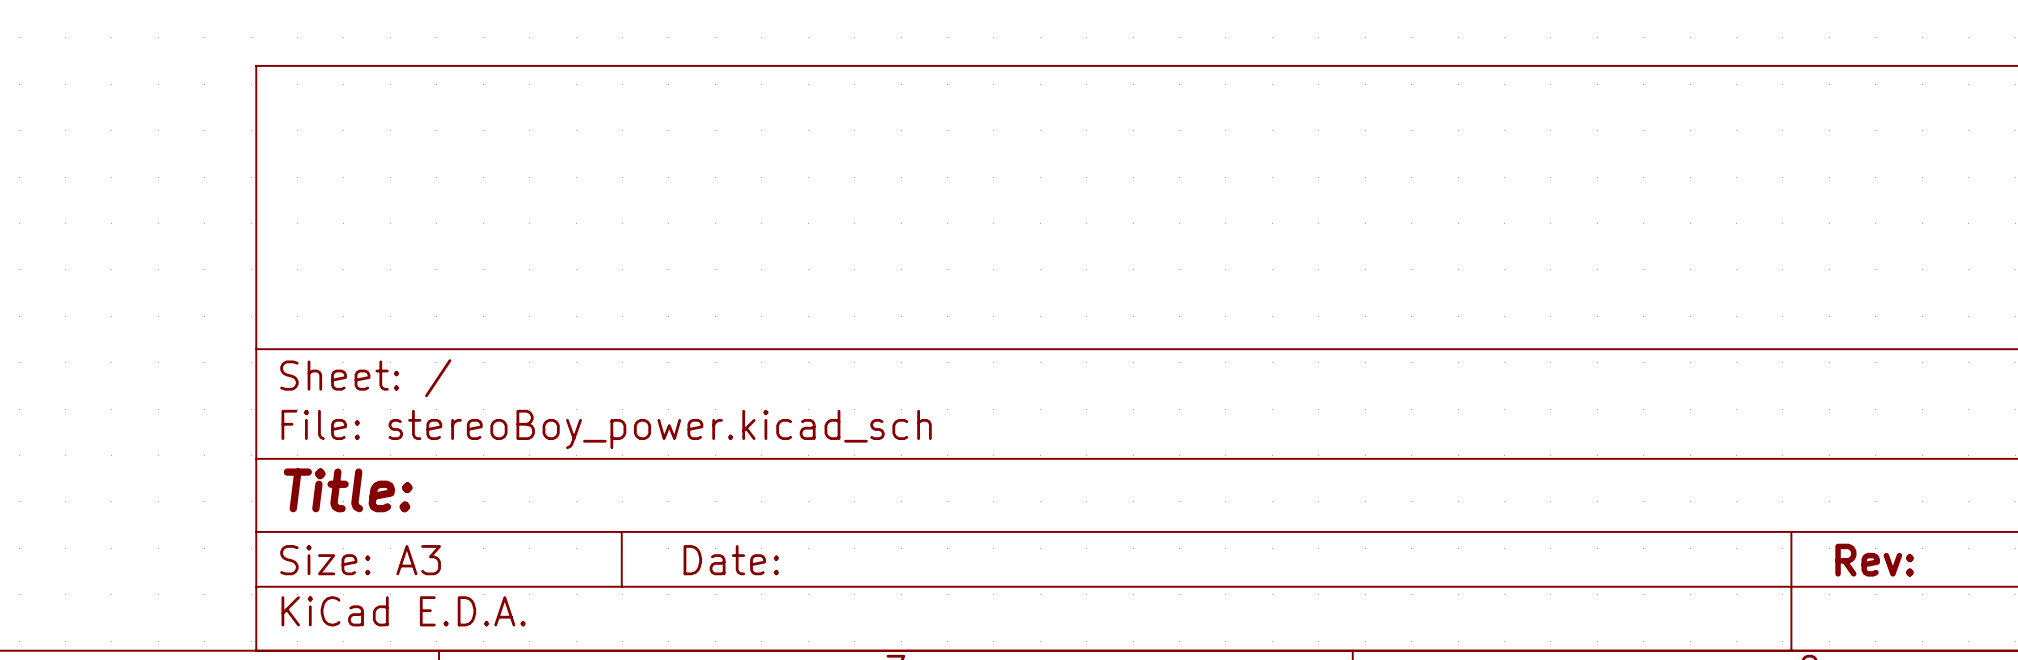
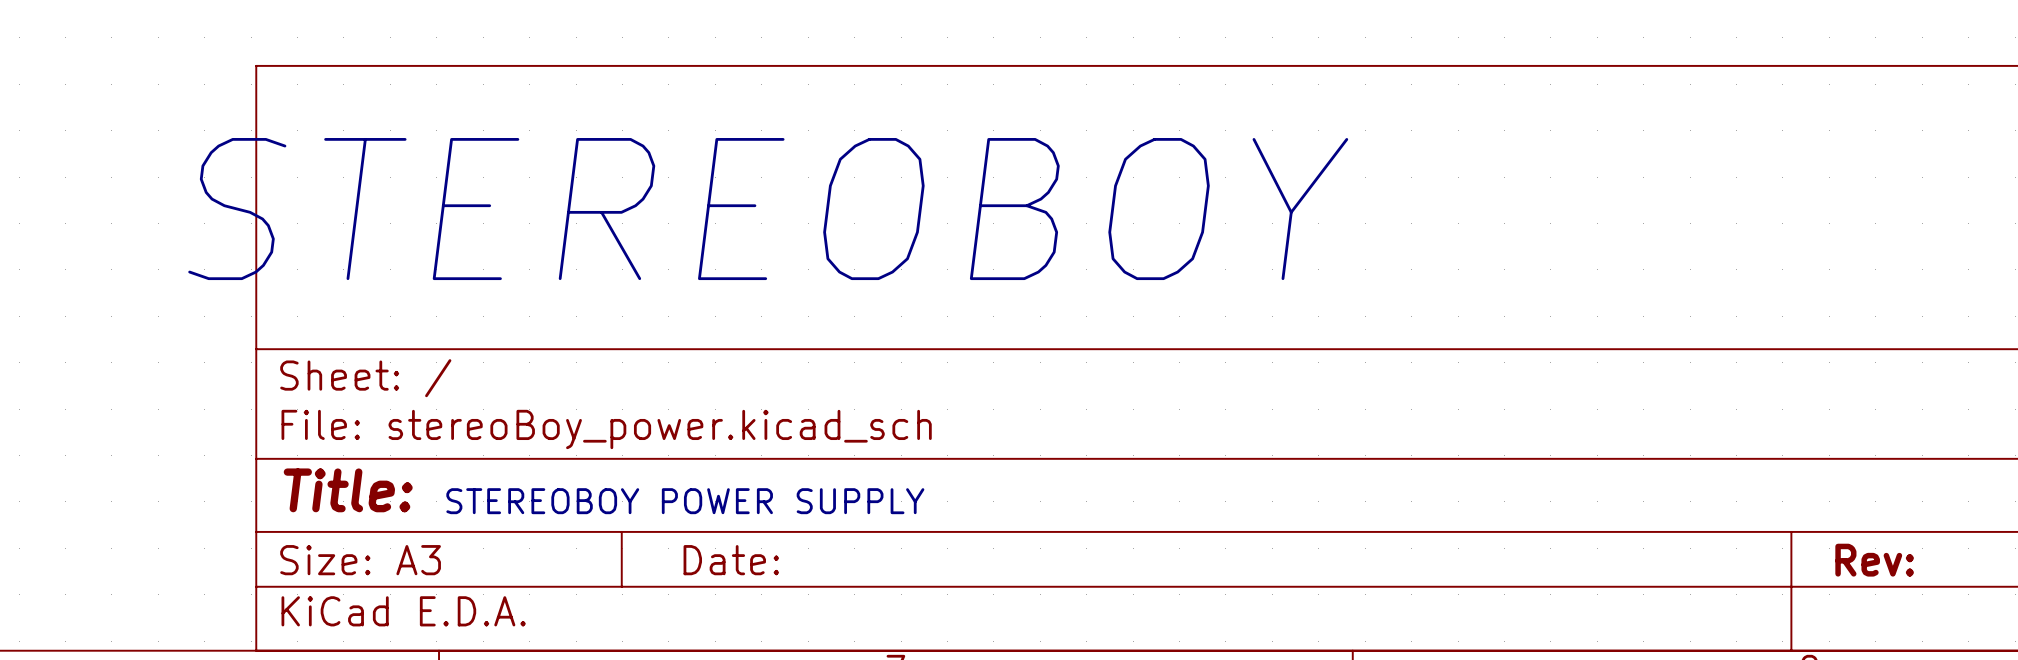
text: none -> STEREOBOY (768, 209)
text: none -> STEREOBOY POWER SUPPLY (685, 501)

